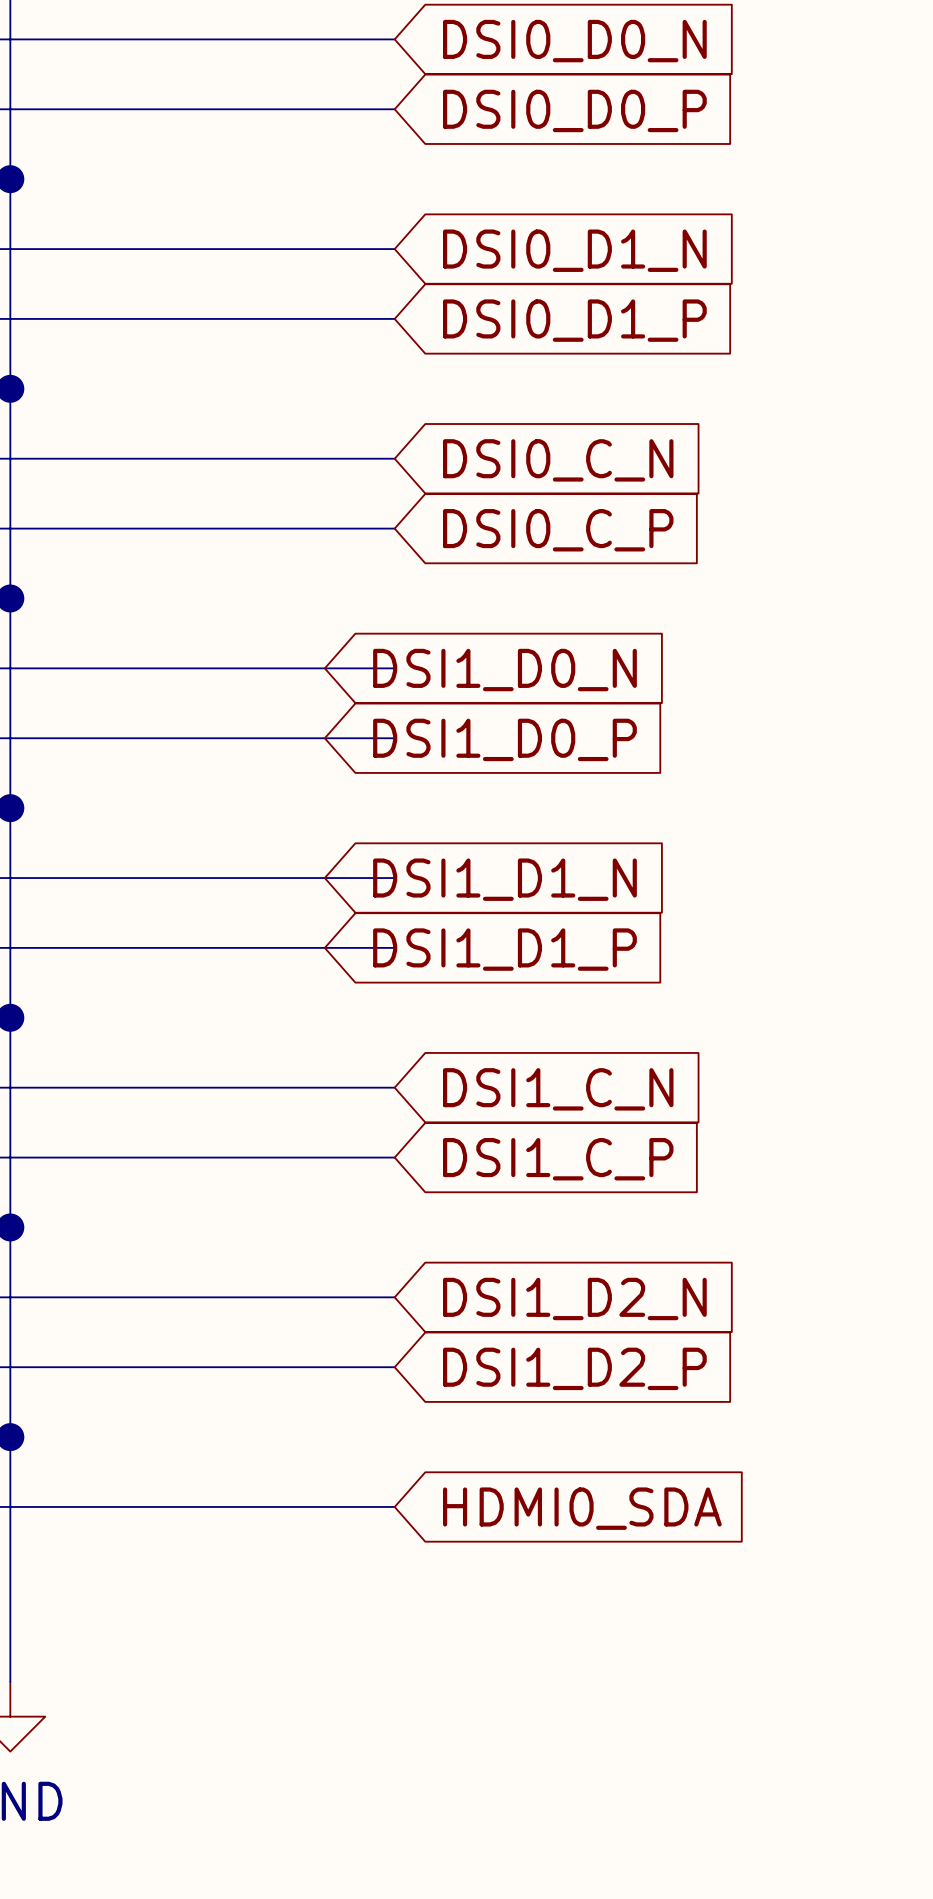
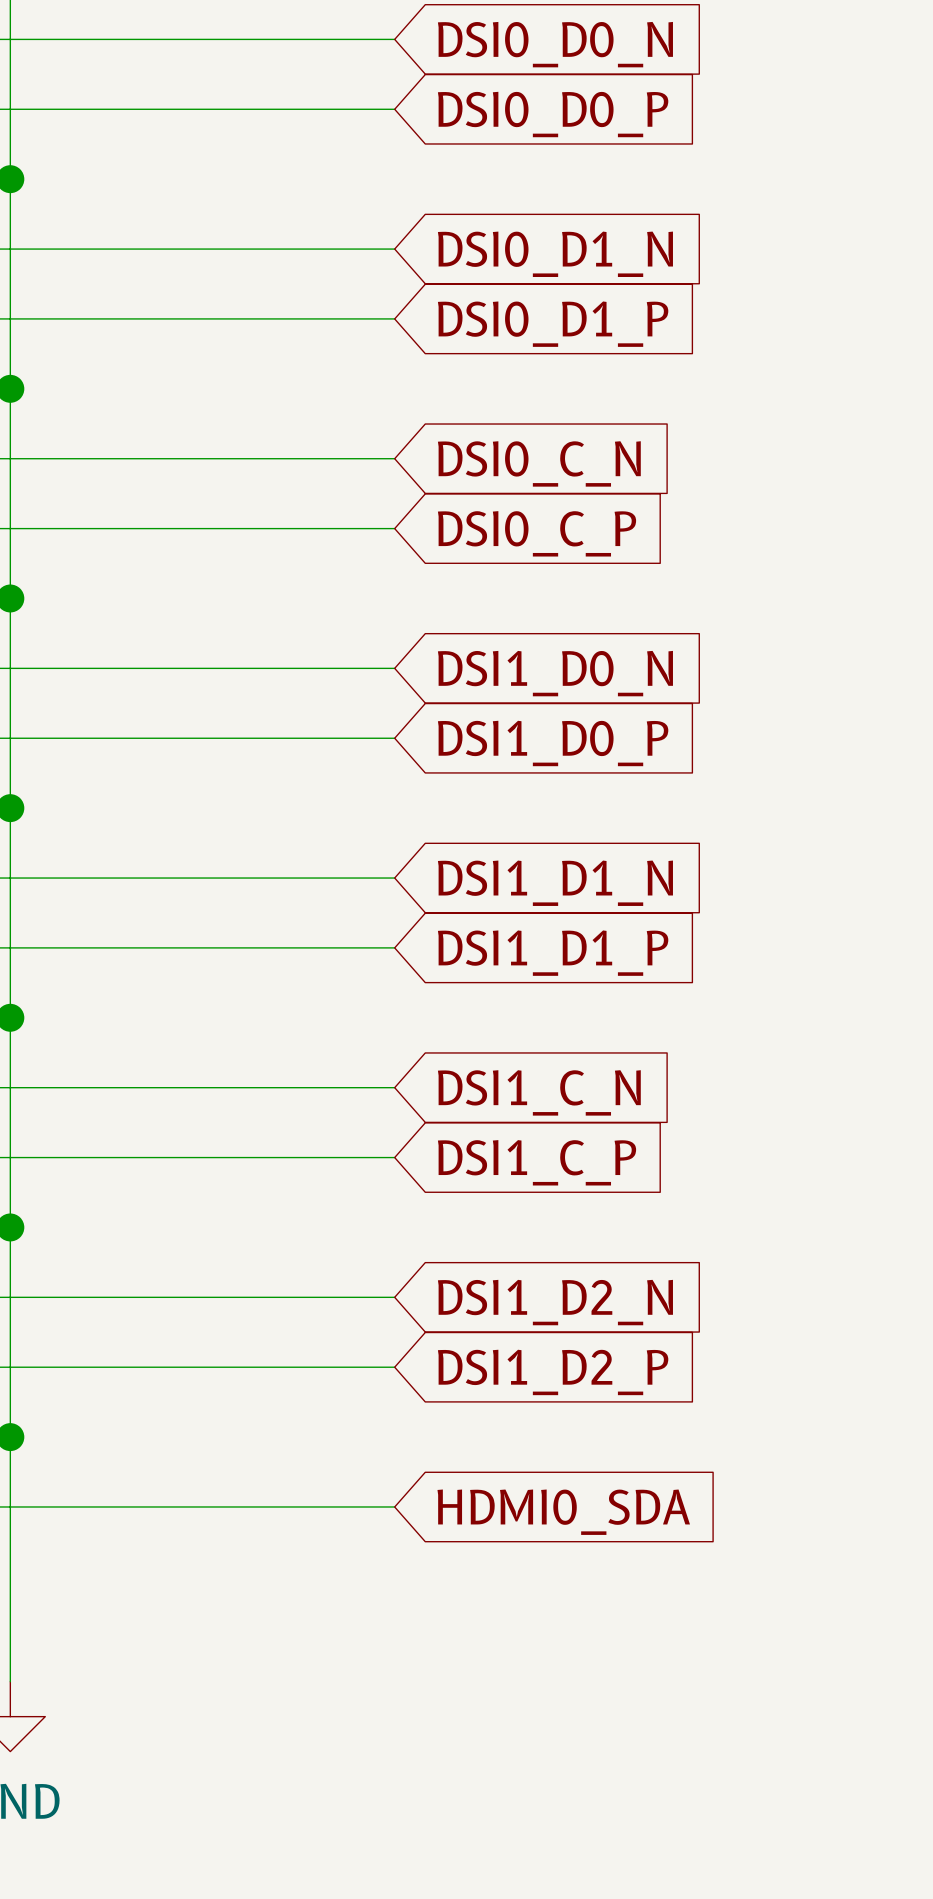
global label position: DSI1_D0_N (504, 670) -> DSI1_D0_N (555, 673)
global label position: DSI1_D0_P (504, 739) -> DSI1_D0_P (553, 743)
global label position: DSI1_D1_N (504, 879) -> DSI1_D1_N (555, 883)
global label position: DSI1_D1_P (504, 949) -> DSI1_D1_P (553, 953)

